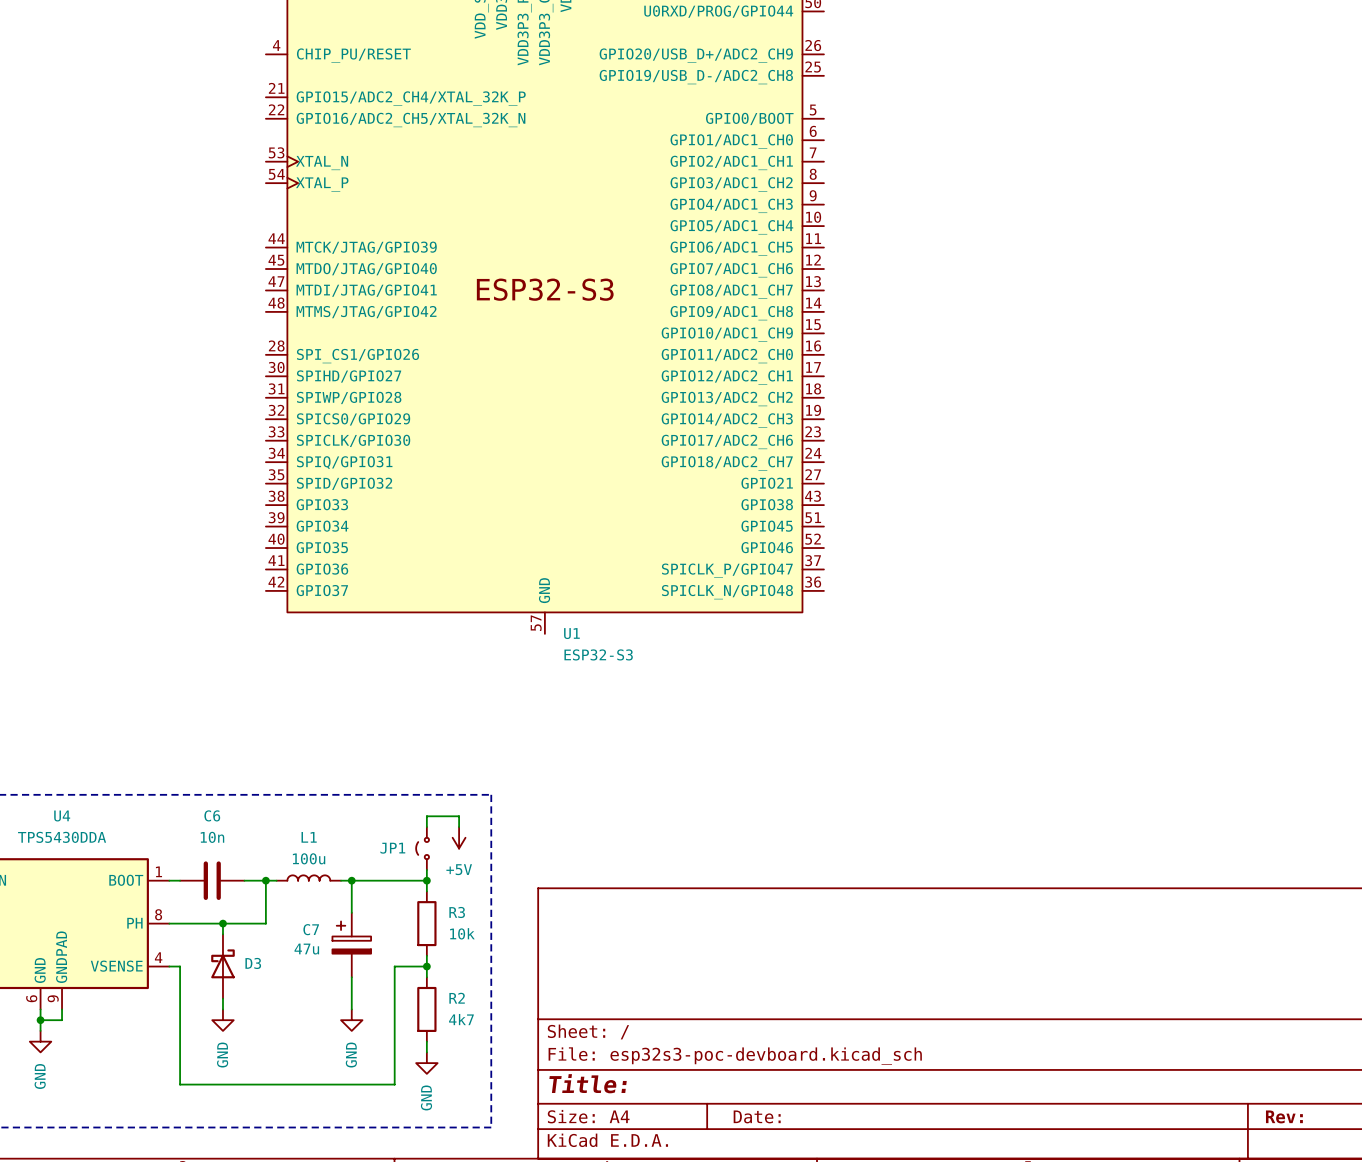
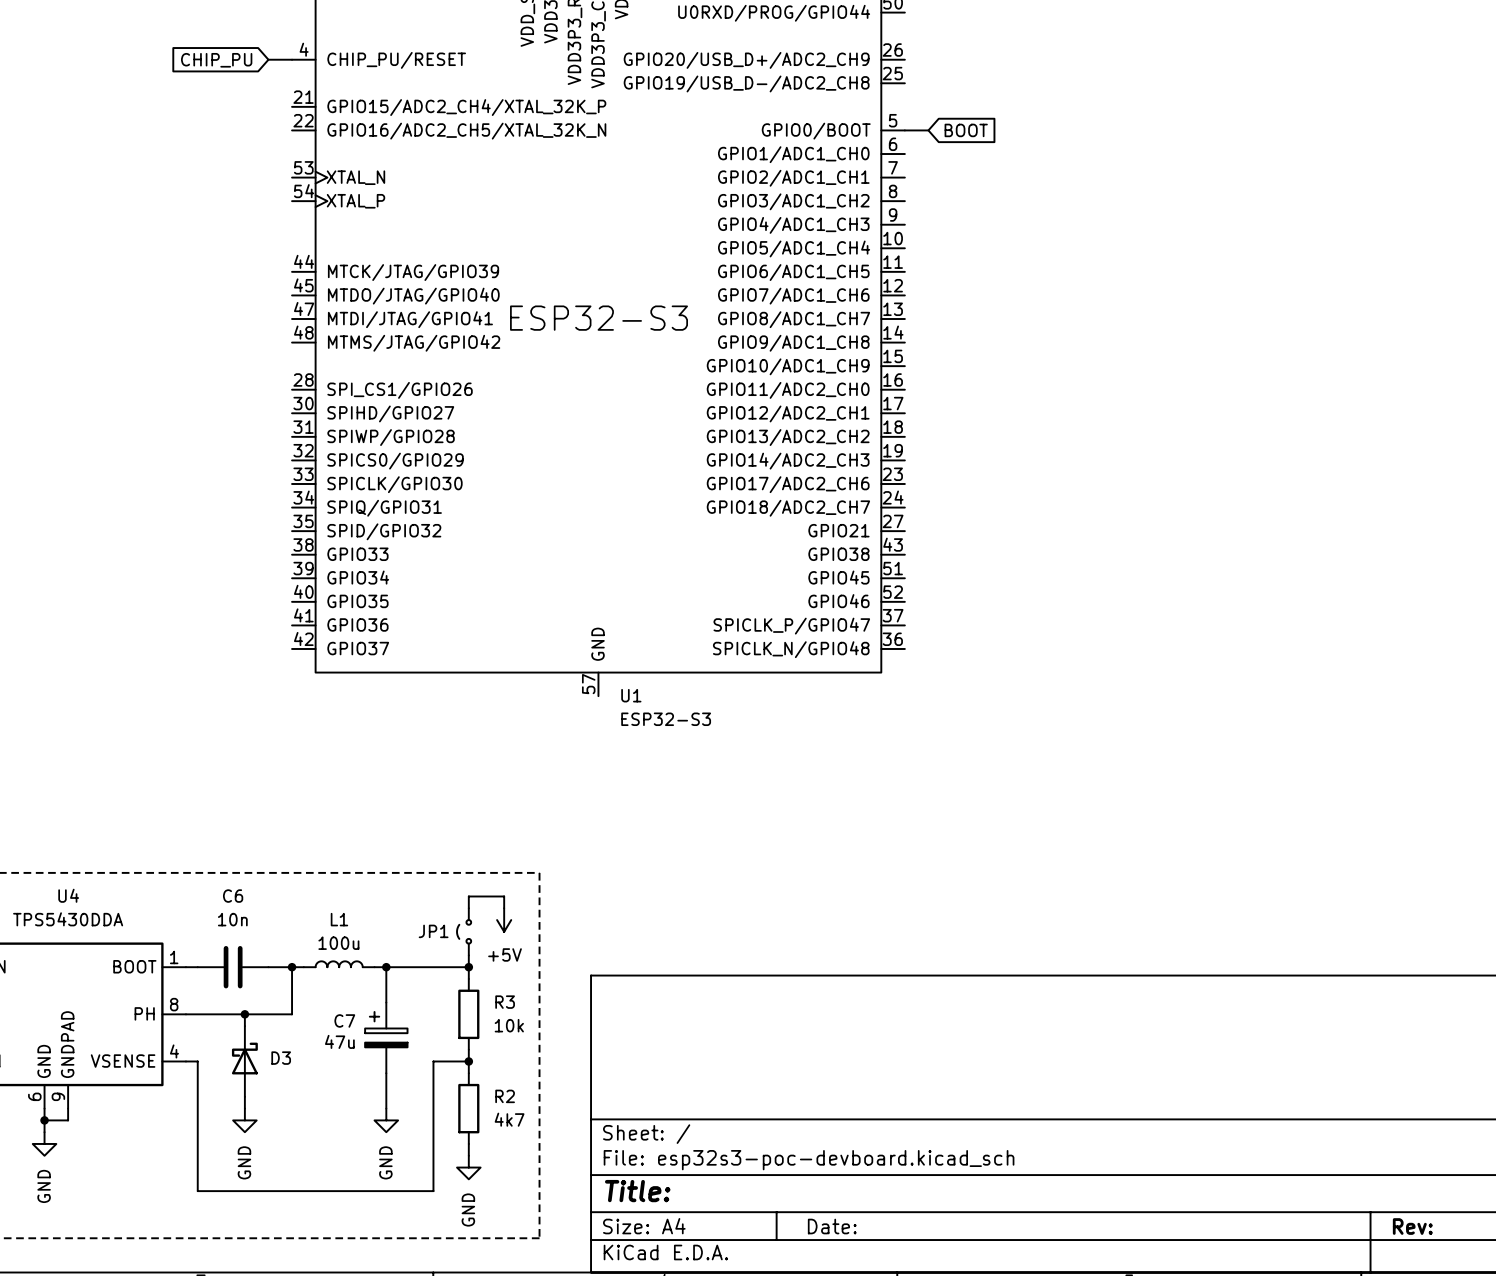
wire: none -> (268, 59) (292, 59)
global label: none -> CHIP_PU (216, 60)
wire: none -> (904, 130) (928, 130)
global label: none -> BOOT (966, 130)

